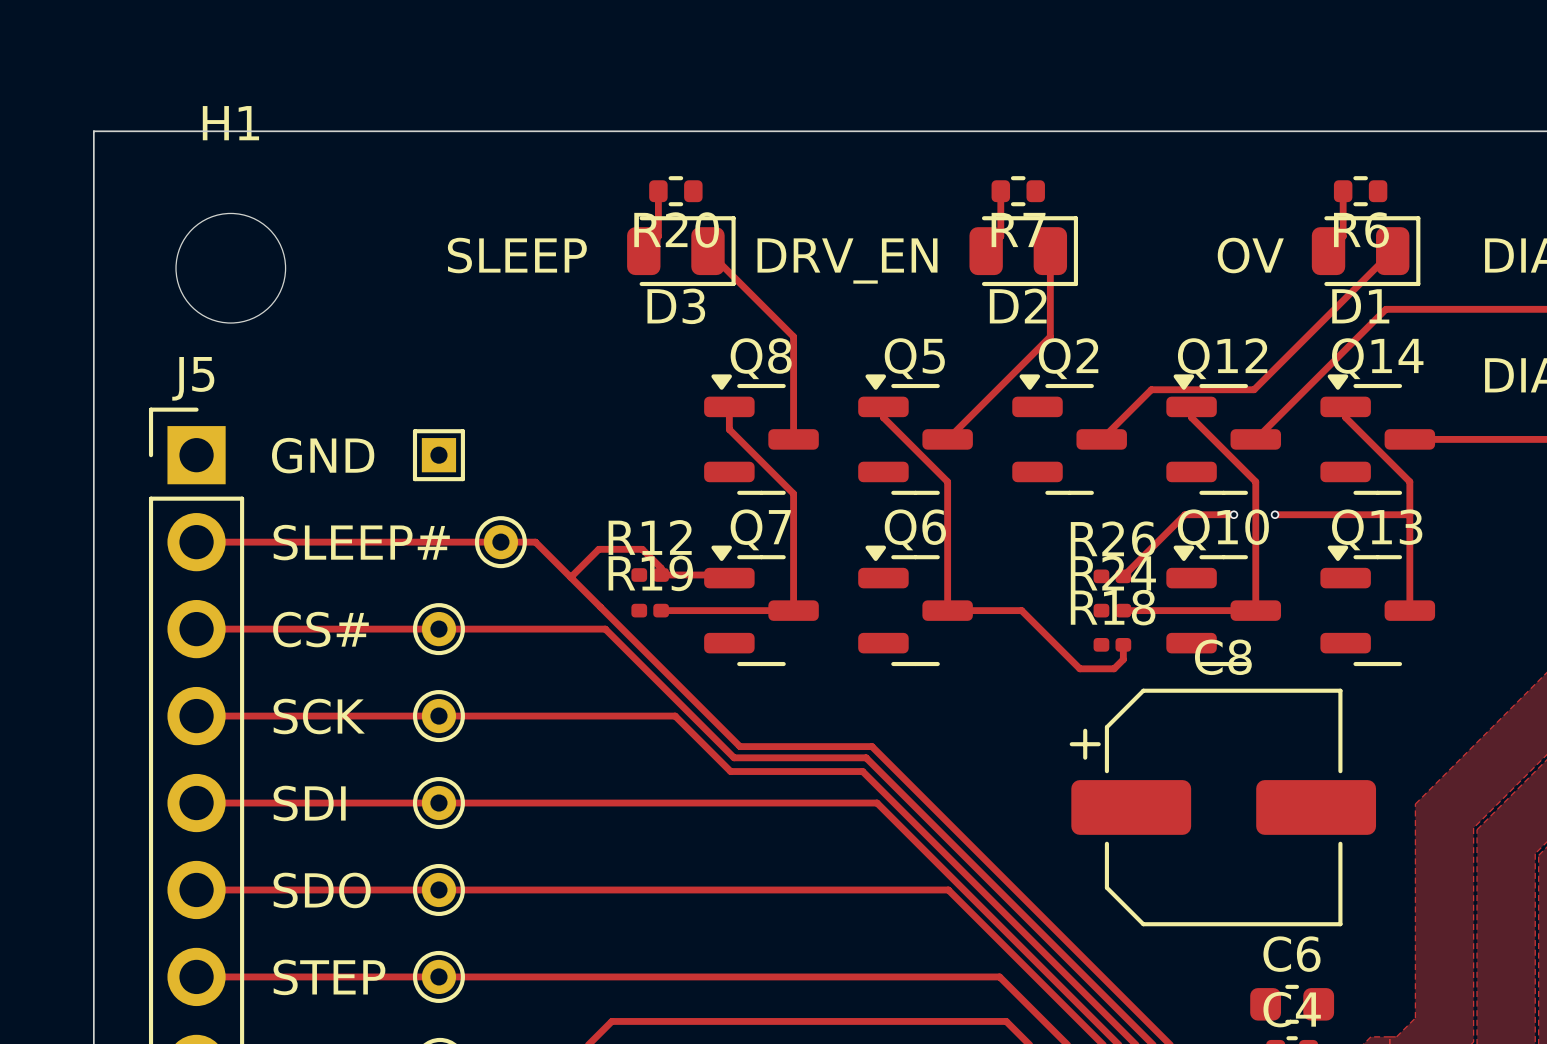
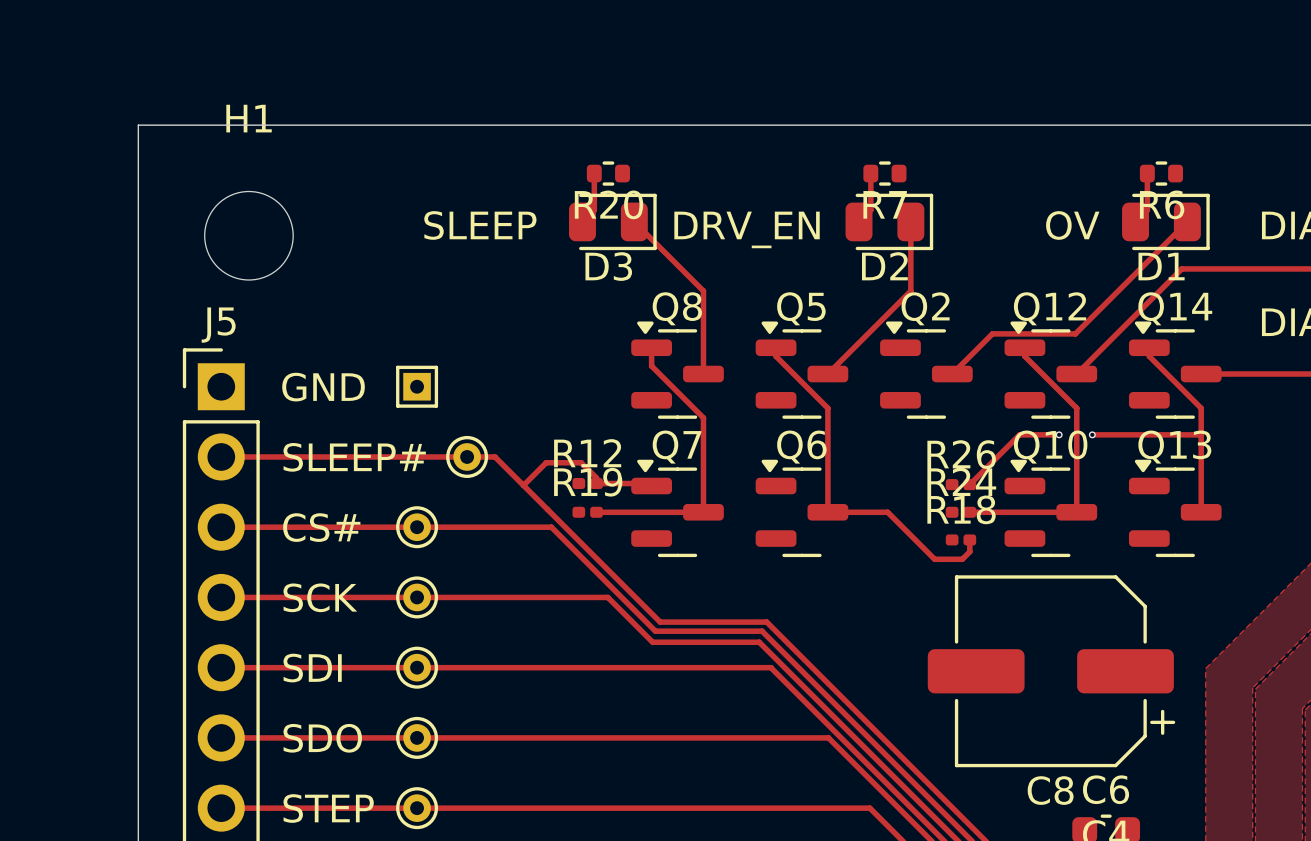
C8 rotation: 0° (1222, 807) -> 180° (1051, 671)

